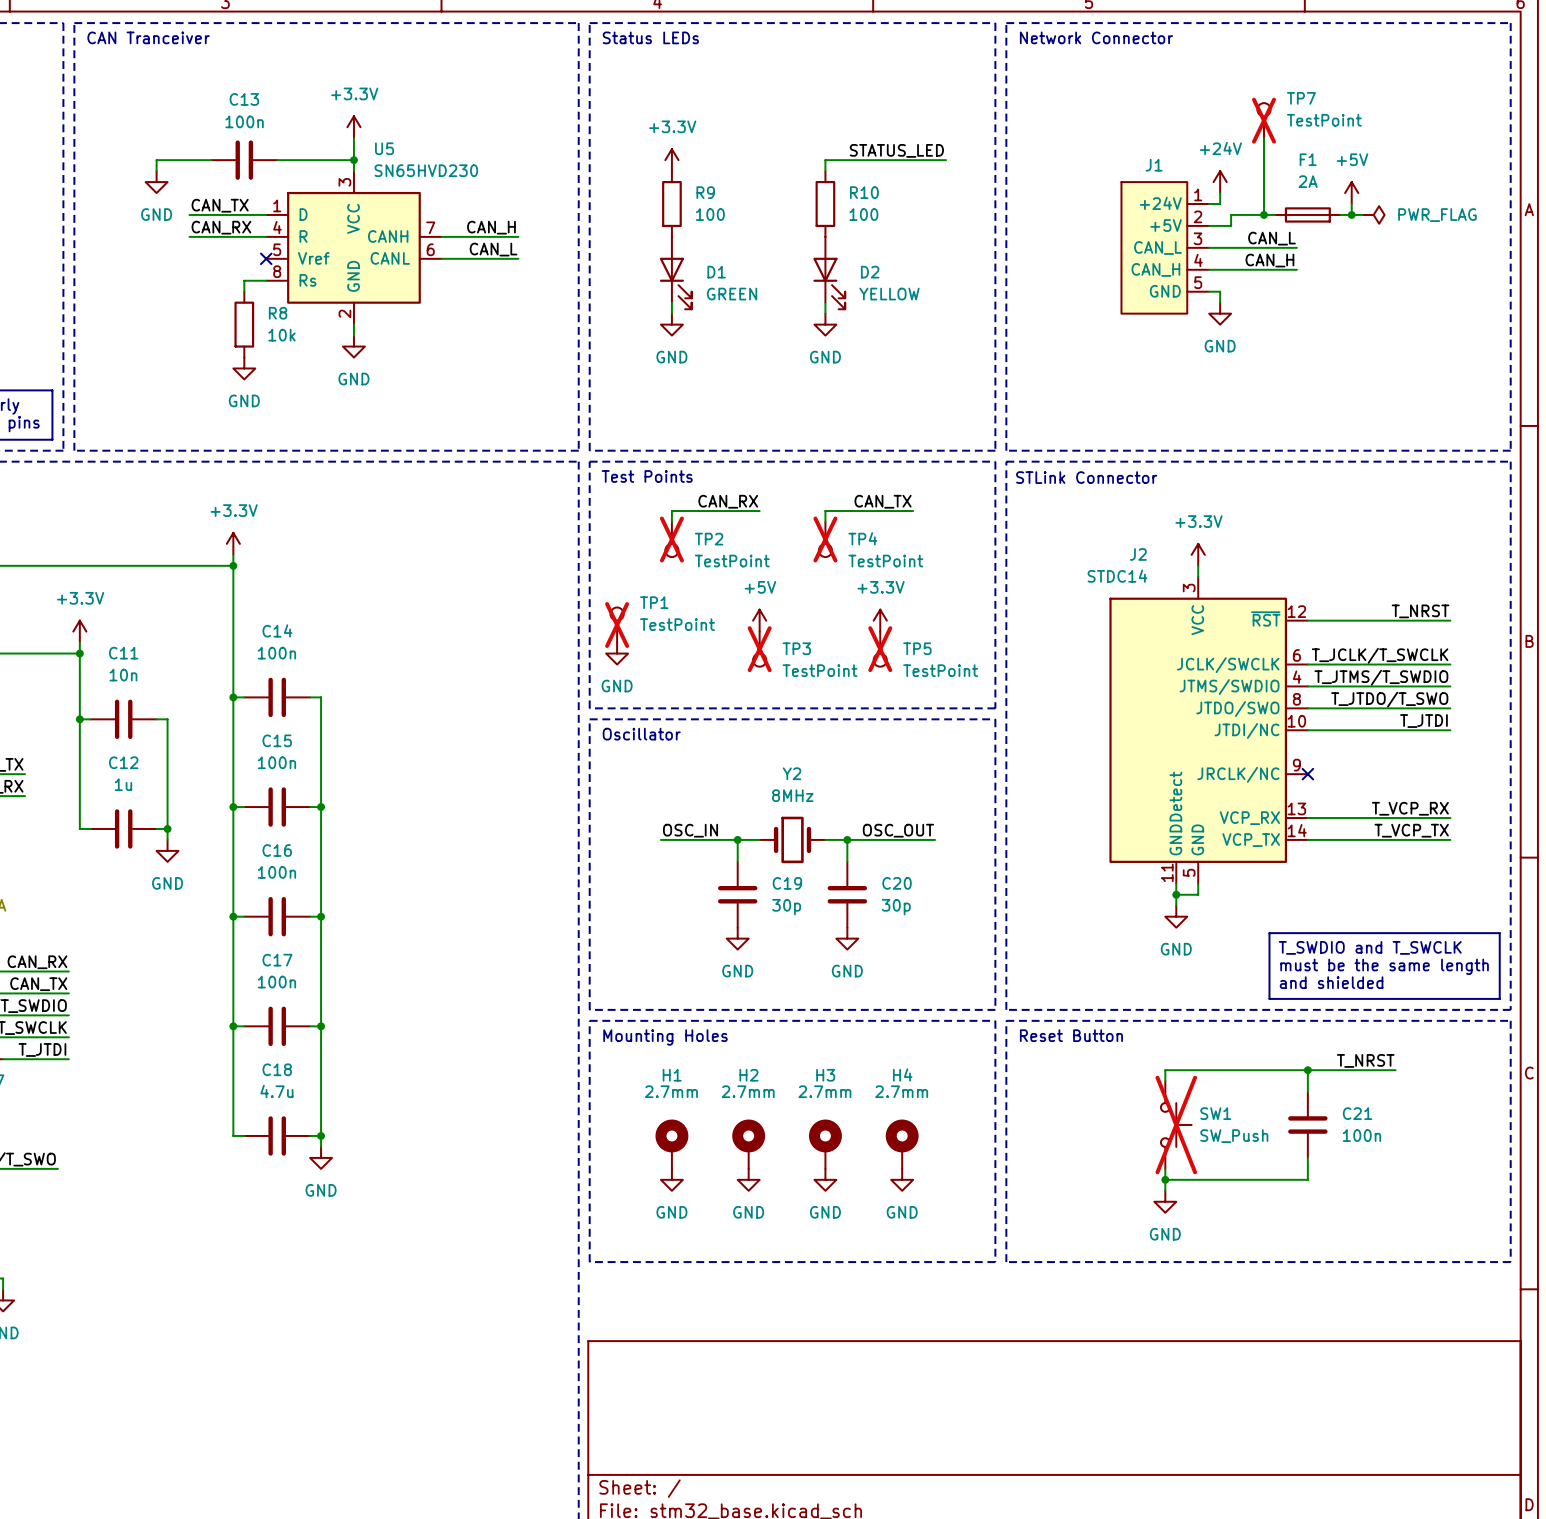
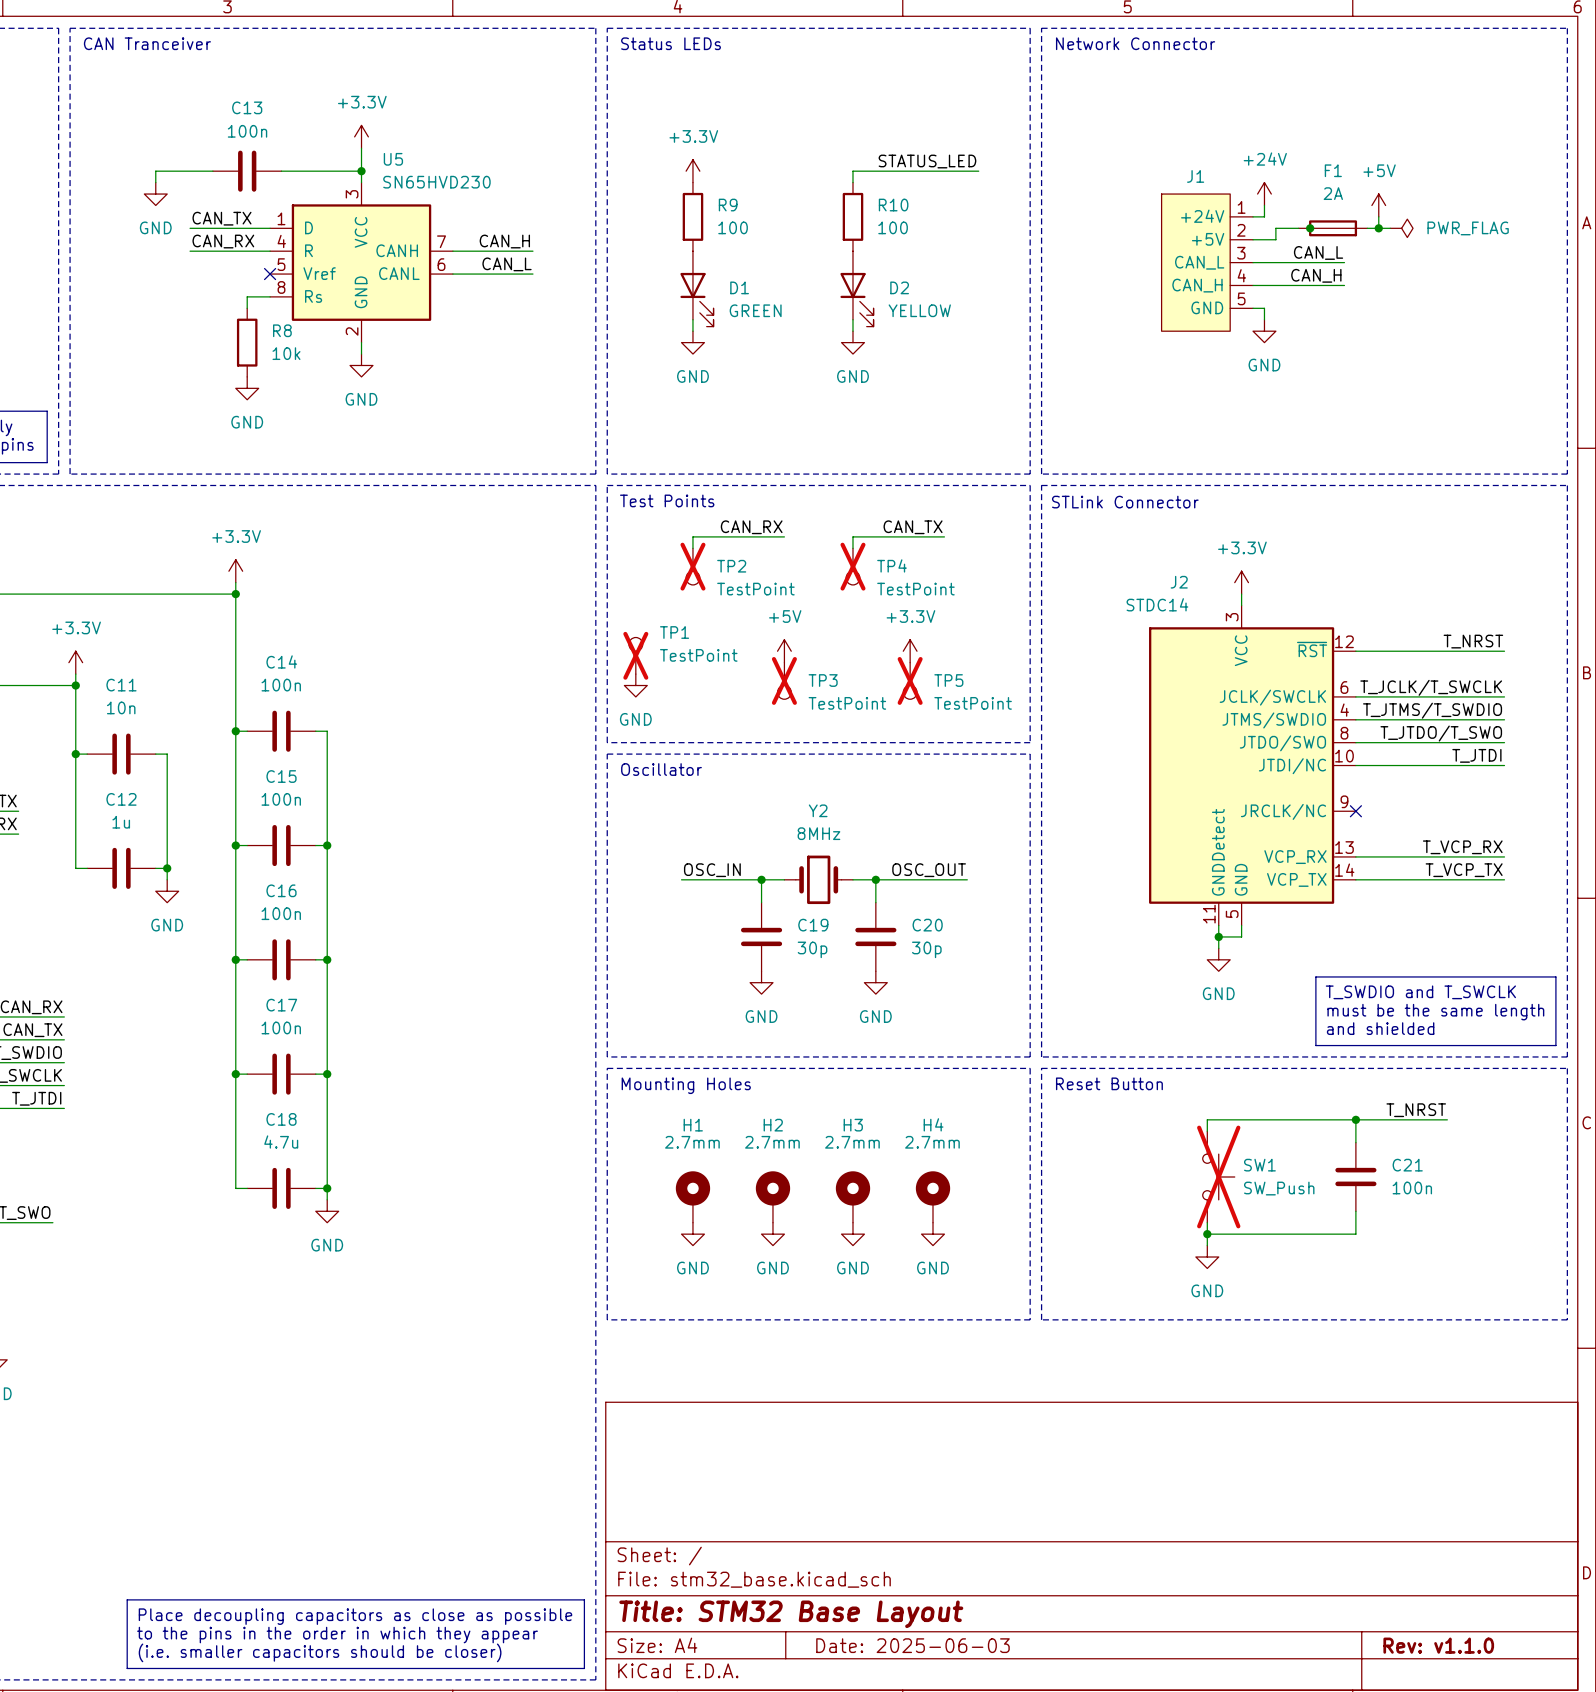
TP7: TestPoint (1264, 120) -> none
wire: (1264, 138) (1264, 214) -> none
power symbol position: +5V (1351, 193) -> +5V (1378, 205)
F1 position: (1307, 214) -> (1333, 228)
junction position: (1351, 214) -> (1378, 228)
power symbol position: PWR_FLAG (1373, 214) -> PWR_FLAG (1401, 228)

